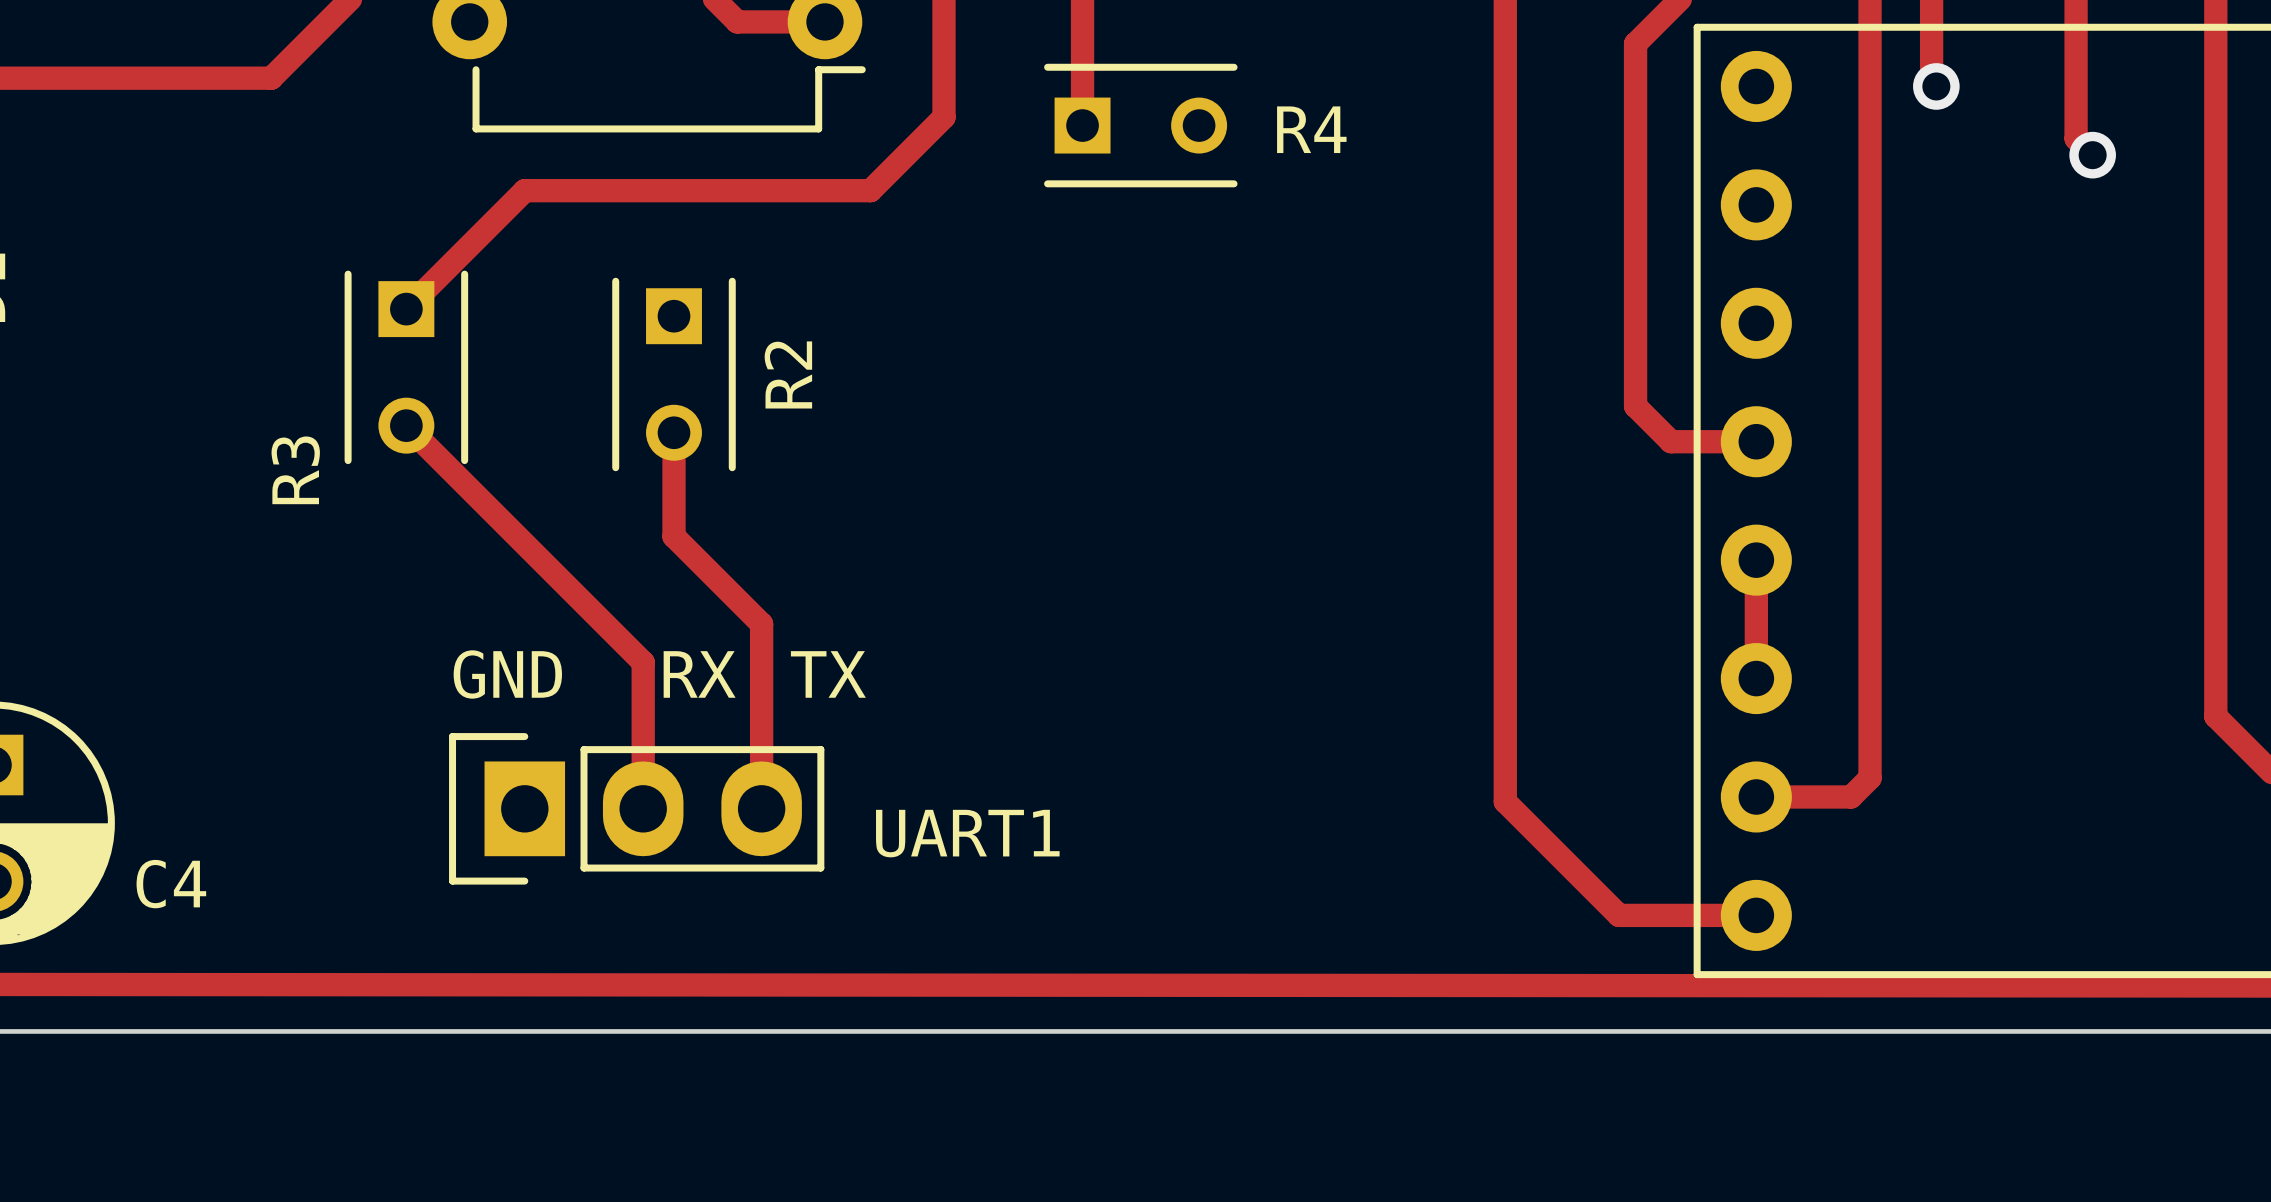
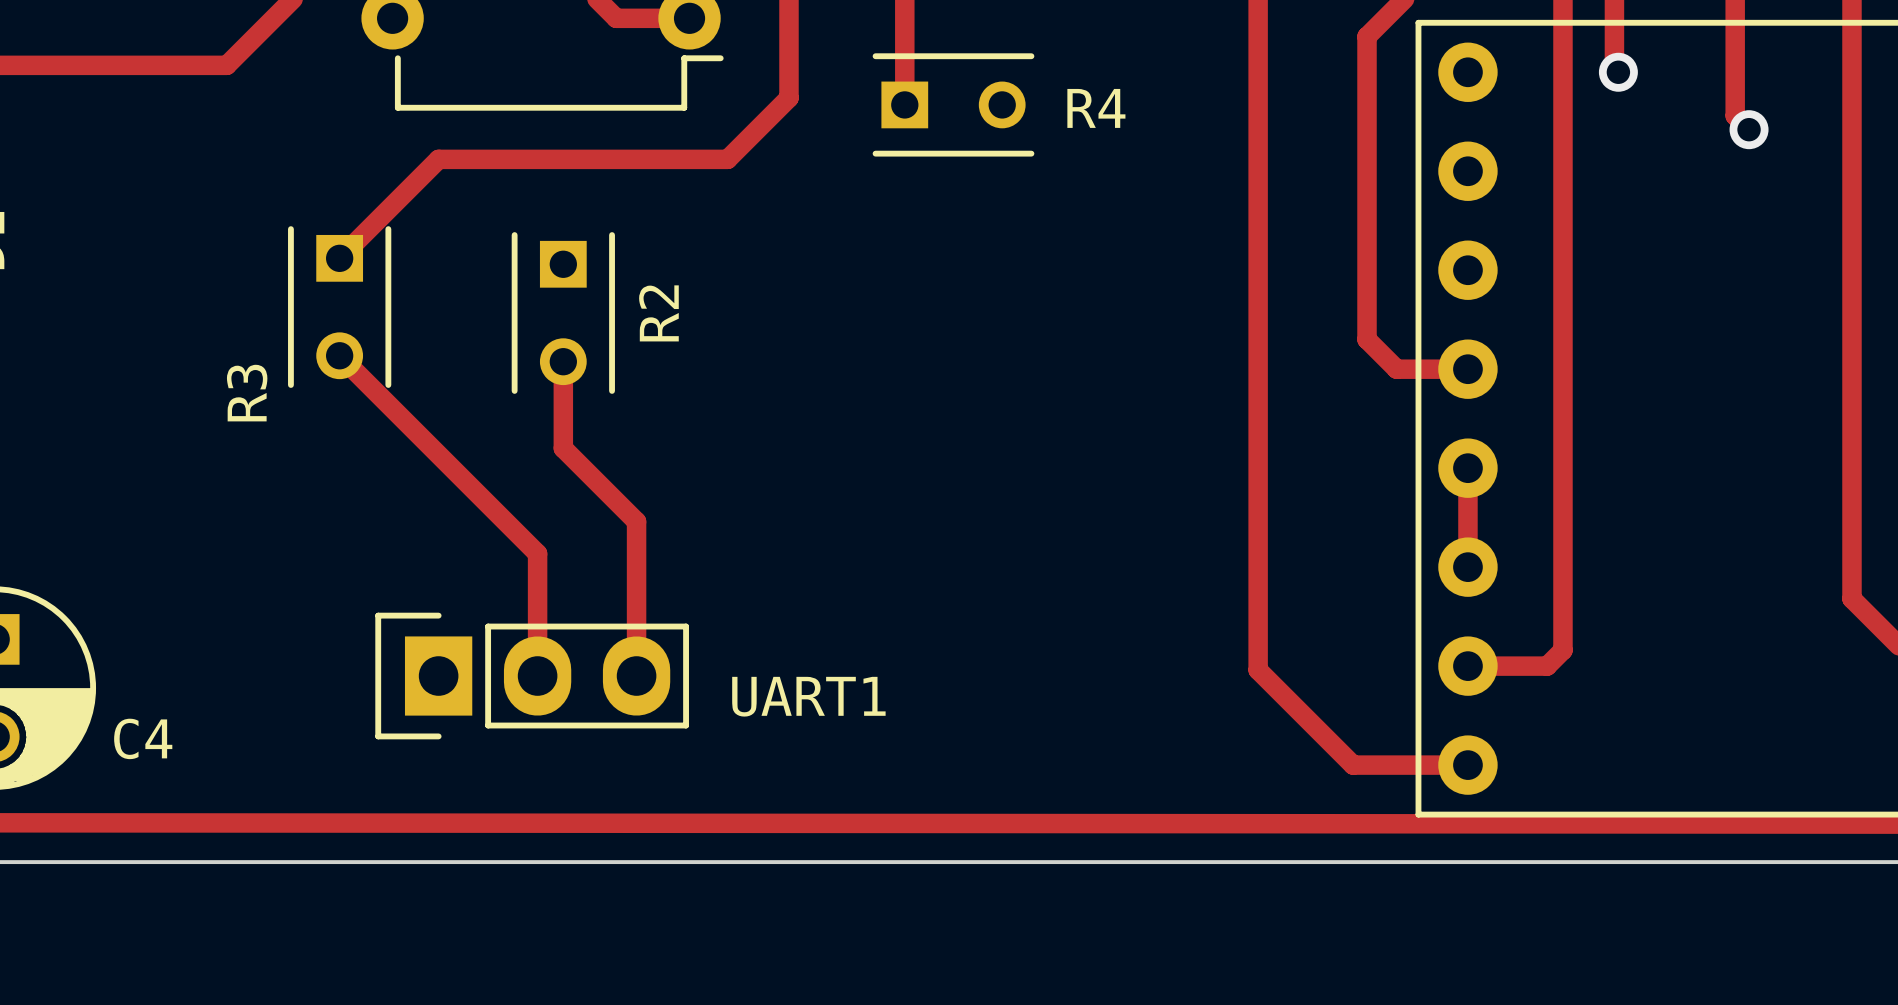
text: GND (507, 674) -> none
text: RX (699, 674) -> none
text: TX (828, 674) -> none

